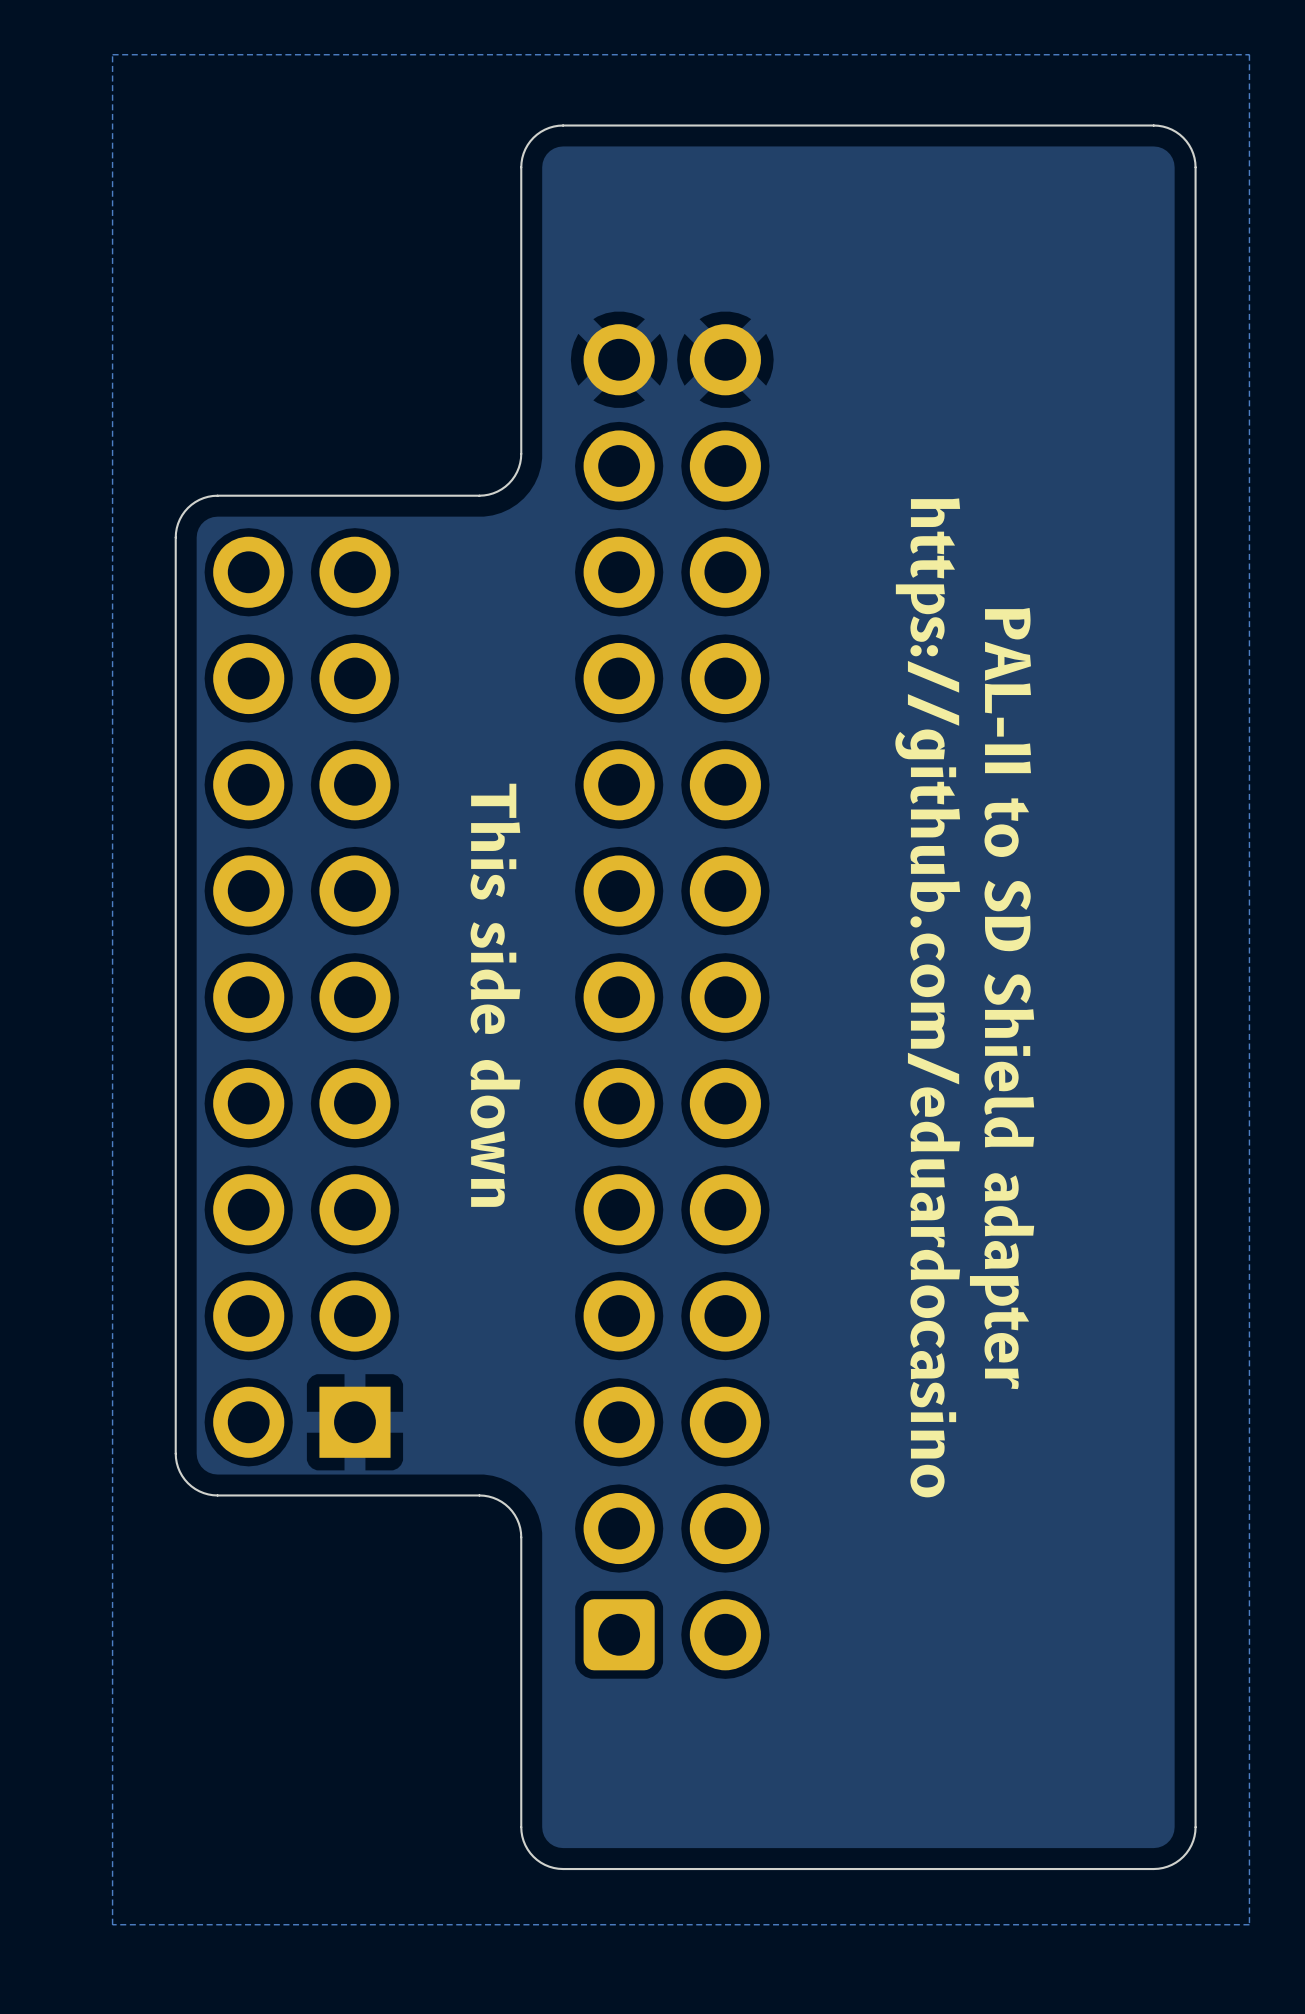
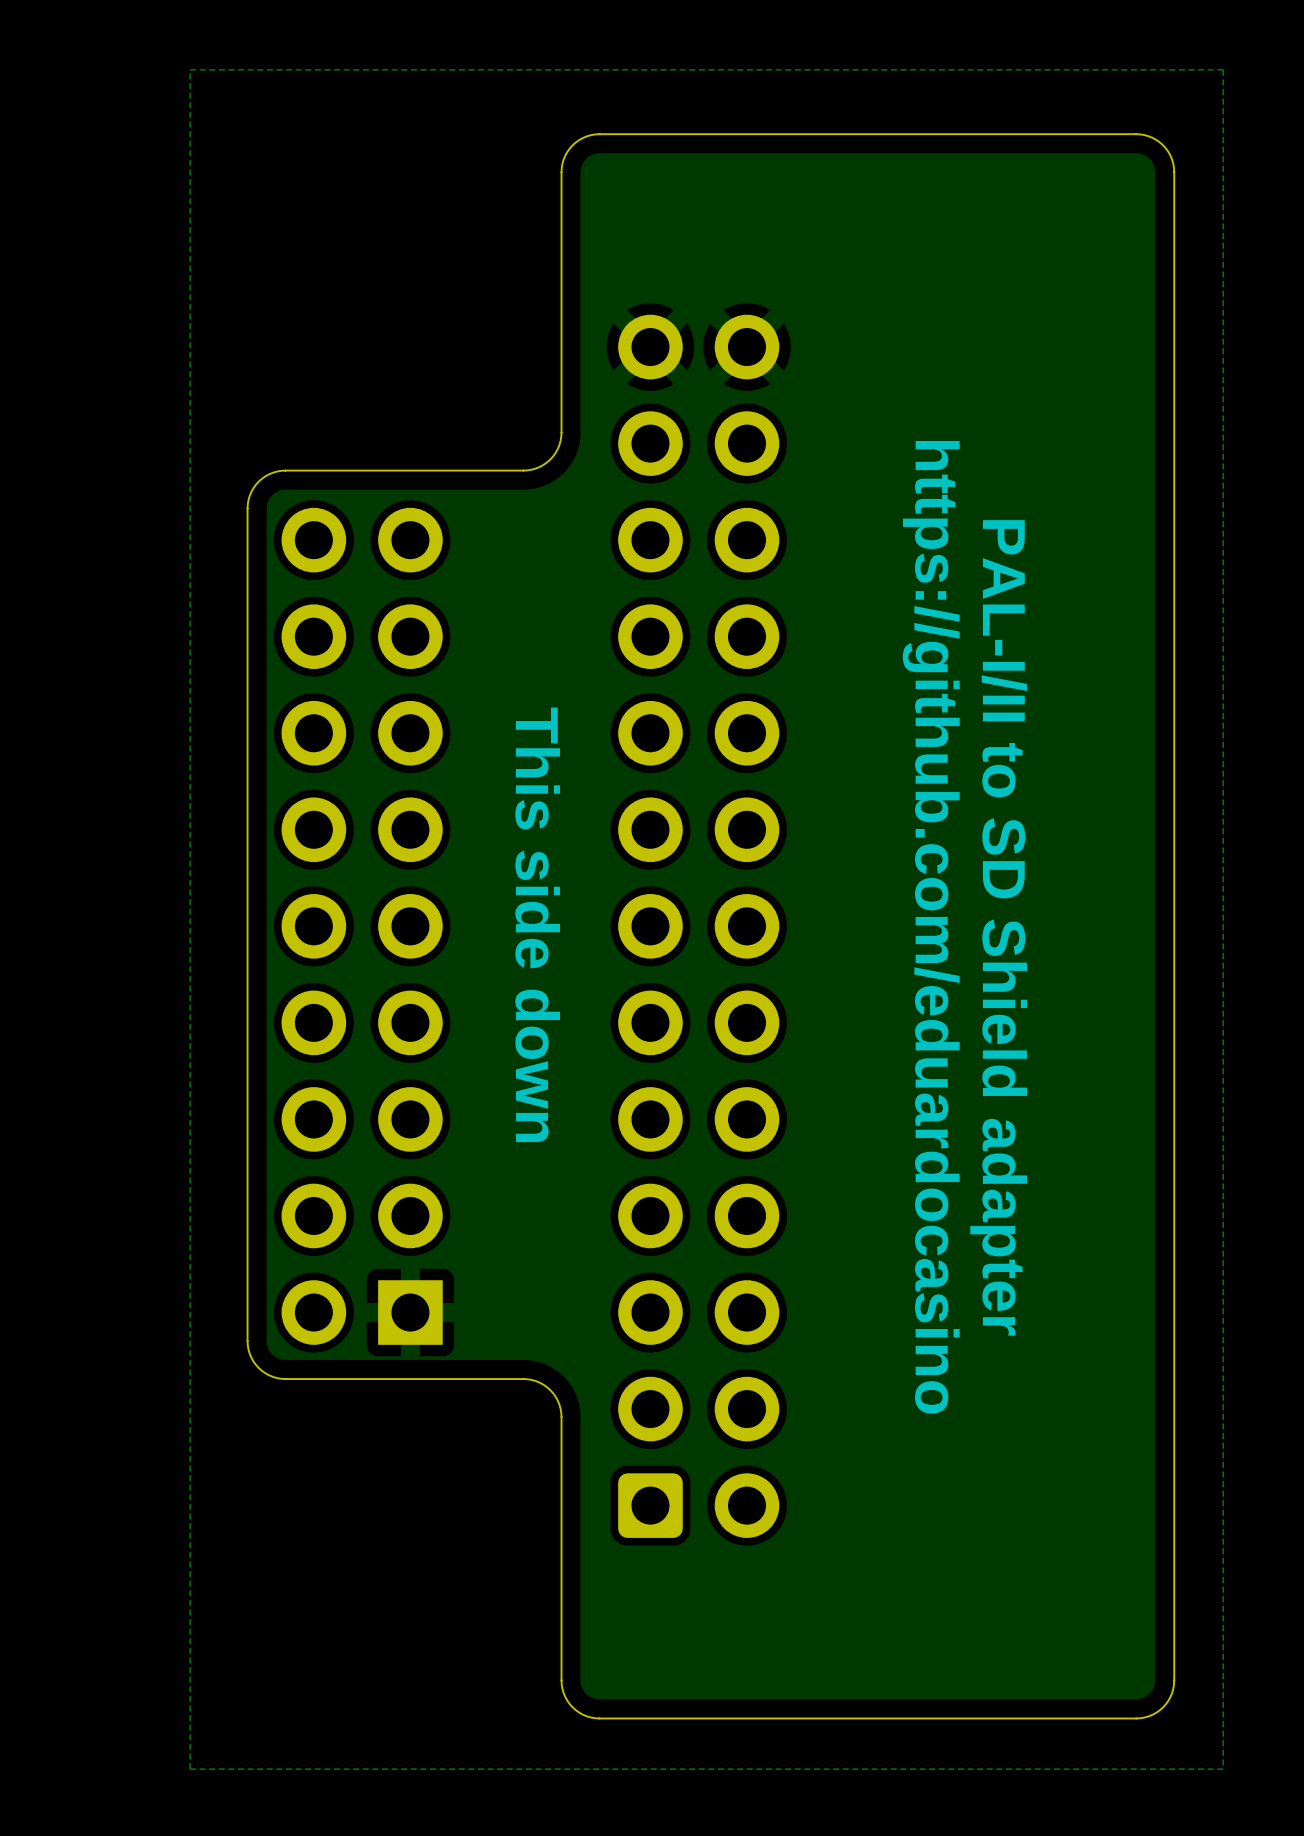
text: PAL-II to SD Shield adapter (1002, 998) -> PAL-I/II to SD Shield adapter (998, 927)

